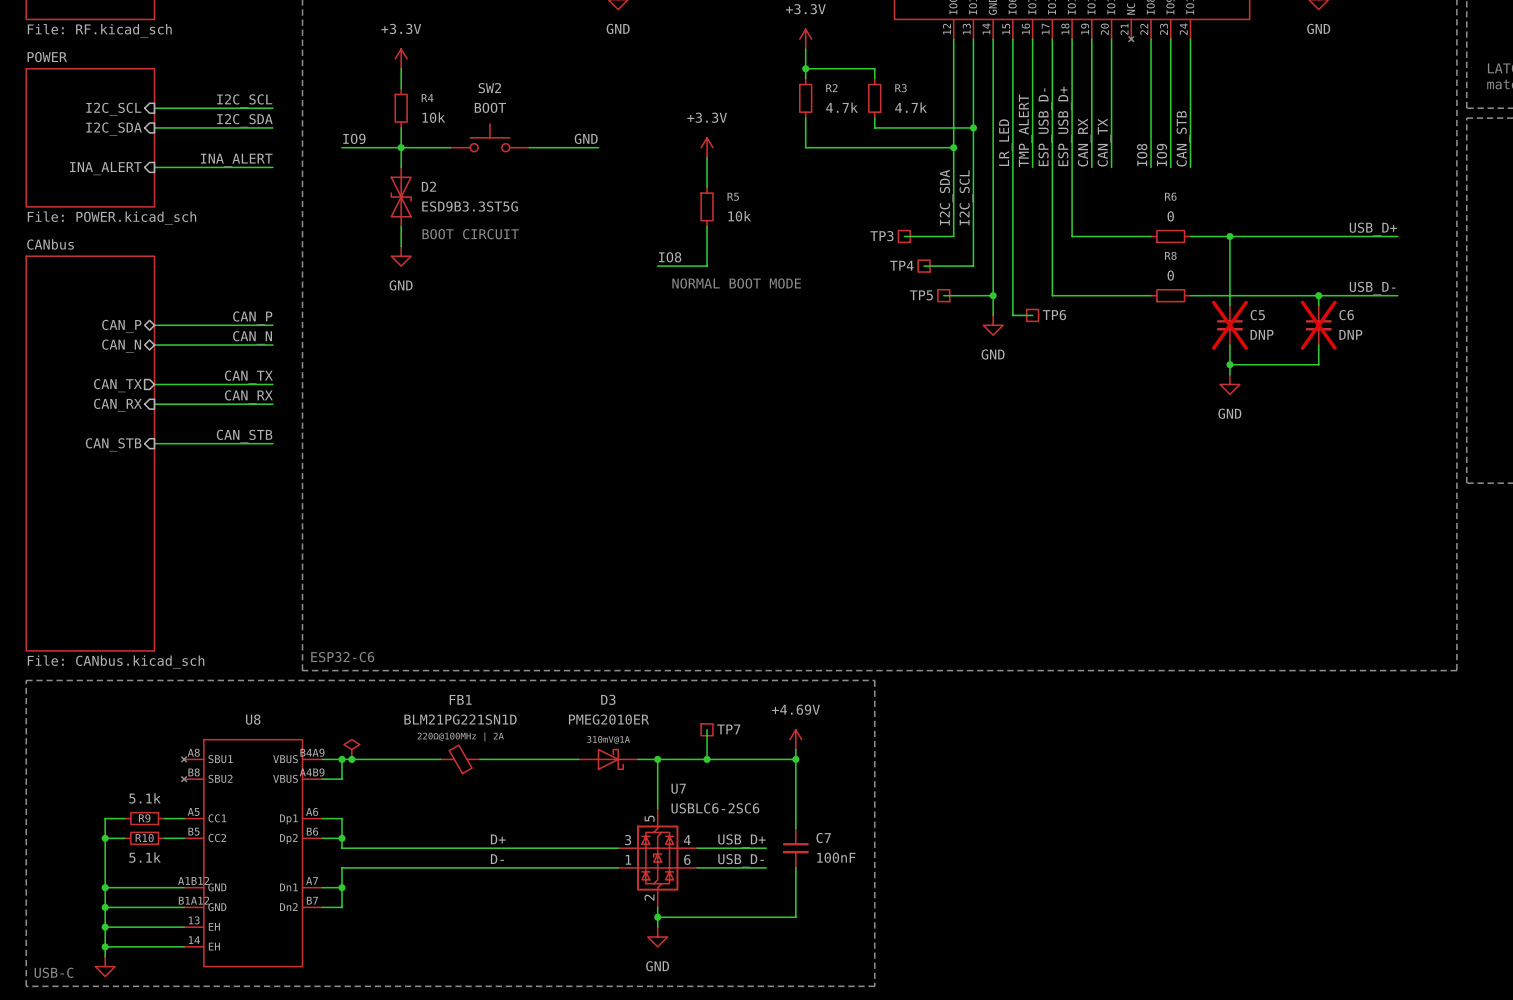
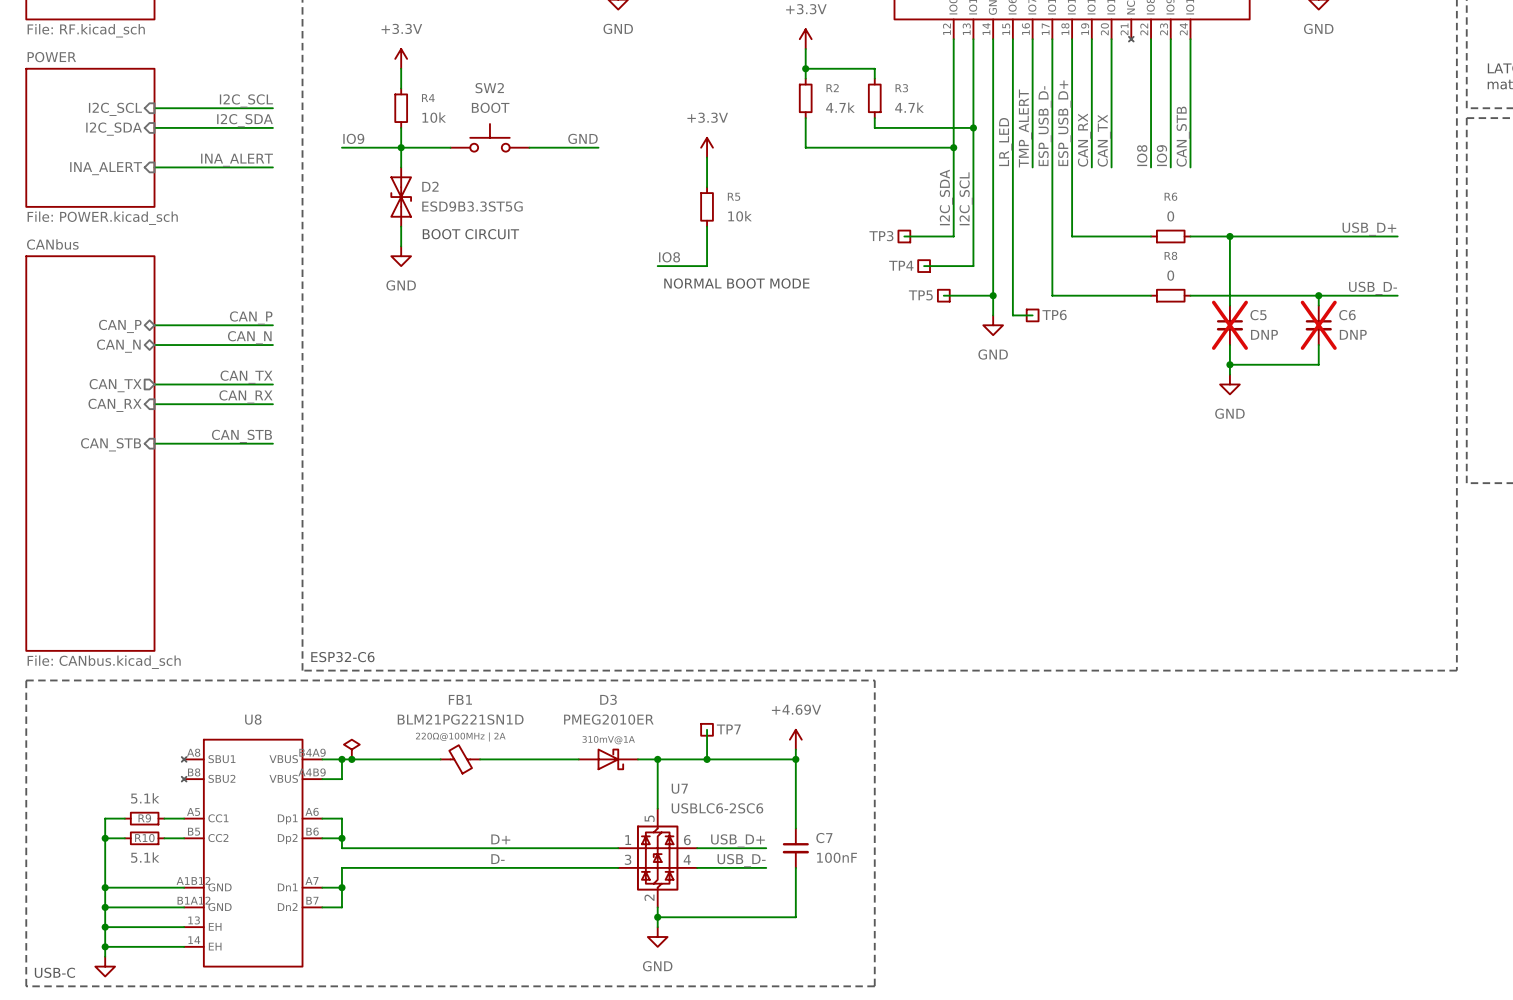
U7 pin number: 3 (628, 840) -> 1 (628, 840)
U7 pin number: 4 (687, 840) -> 6 (687, 840)
U7 pin number: 1 (628, 859) -> 3 (628, 859)
U7 pin number: 6 (687, 859) -> 4 (687, 859)

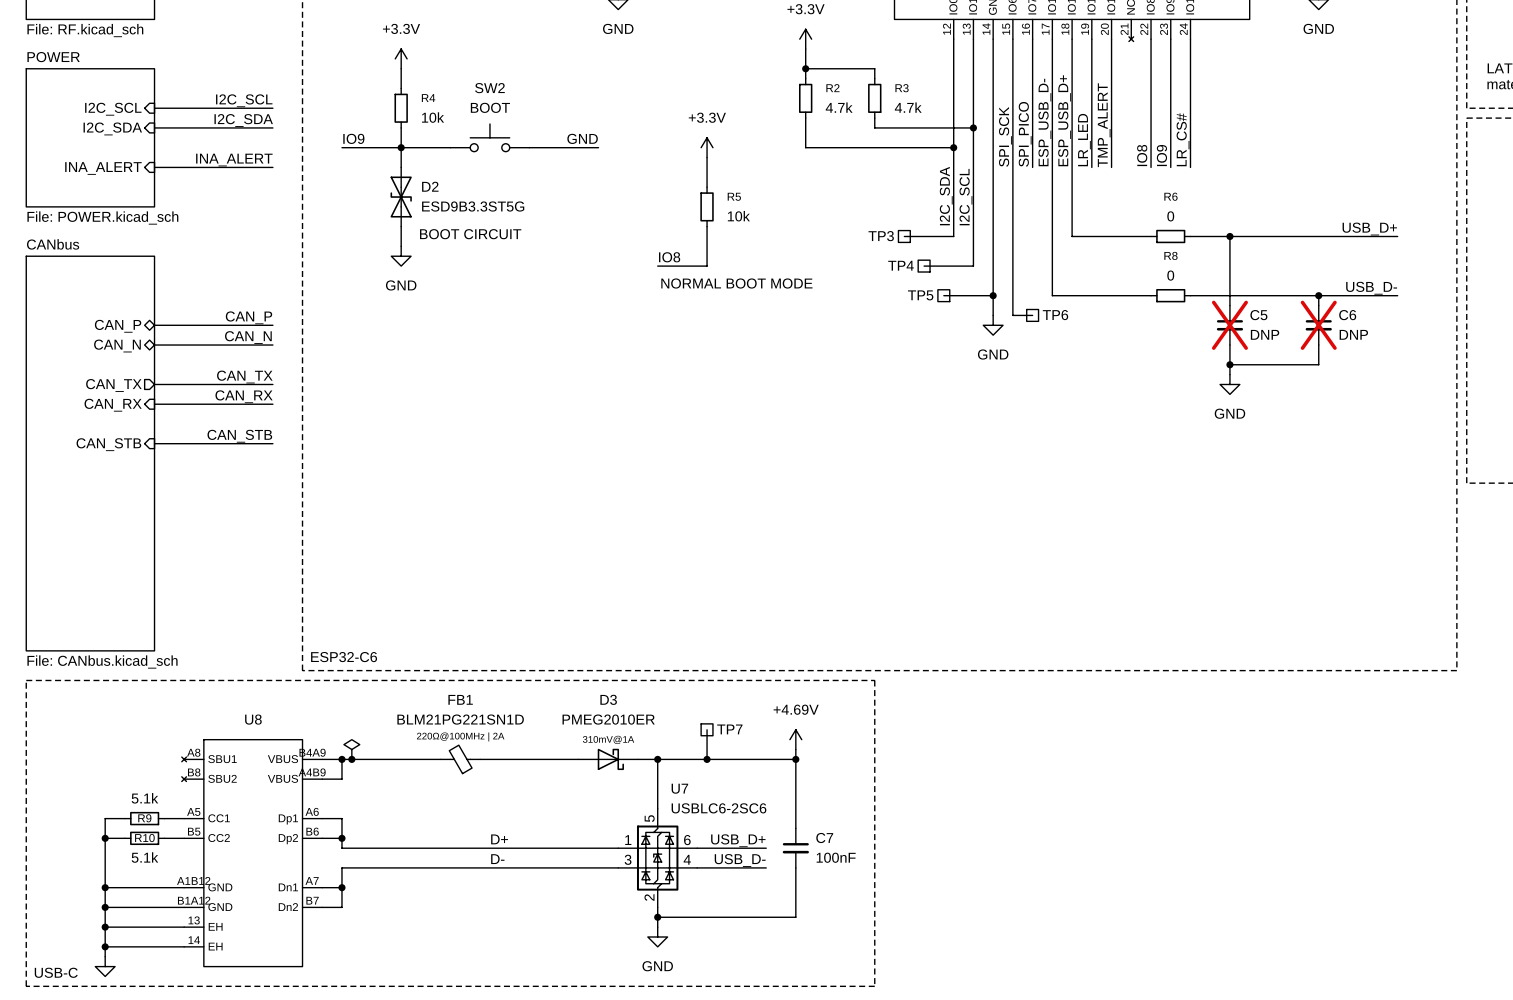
label: TMP_ALERT (1025, 128) -> SPI_PICO (1025, 134)
label: CAN_STB (1183, 136) -> LR_CS# (1183, 139)
label: CAN_RX (1084, 140) -> LR_LED (1084, 140)
label: CAN_TX (1104, 140) -> TMP_ALERT (1104, 125)
label: LR_LED (1005, 142) -> SPI_SCK (1005, 136)

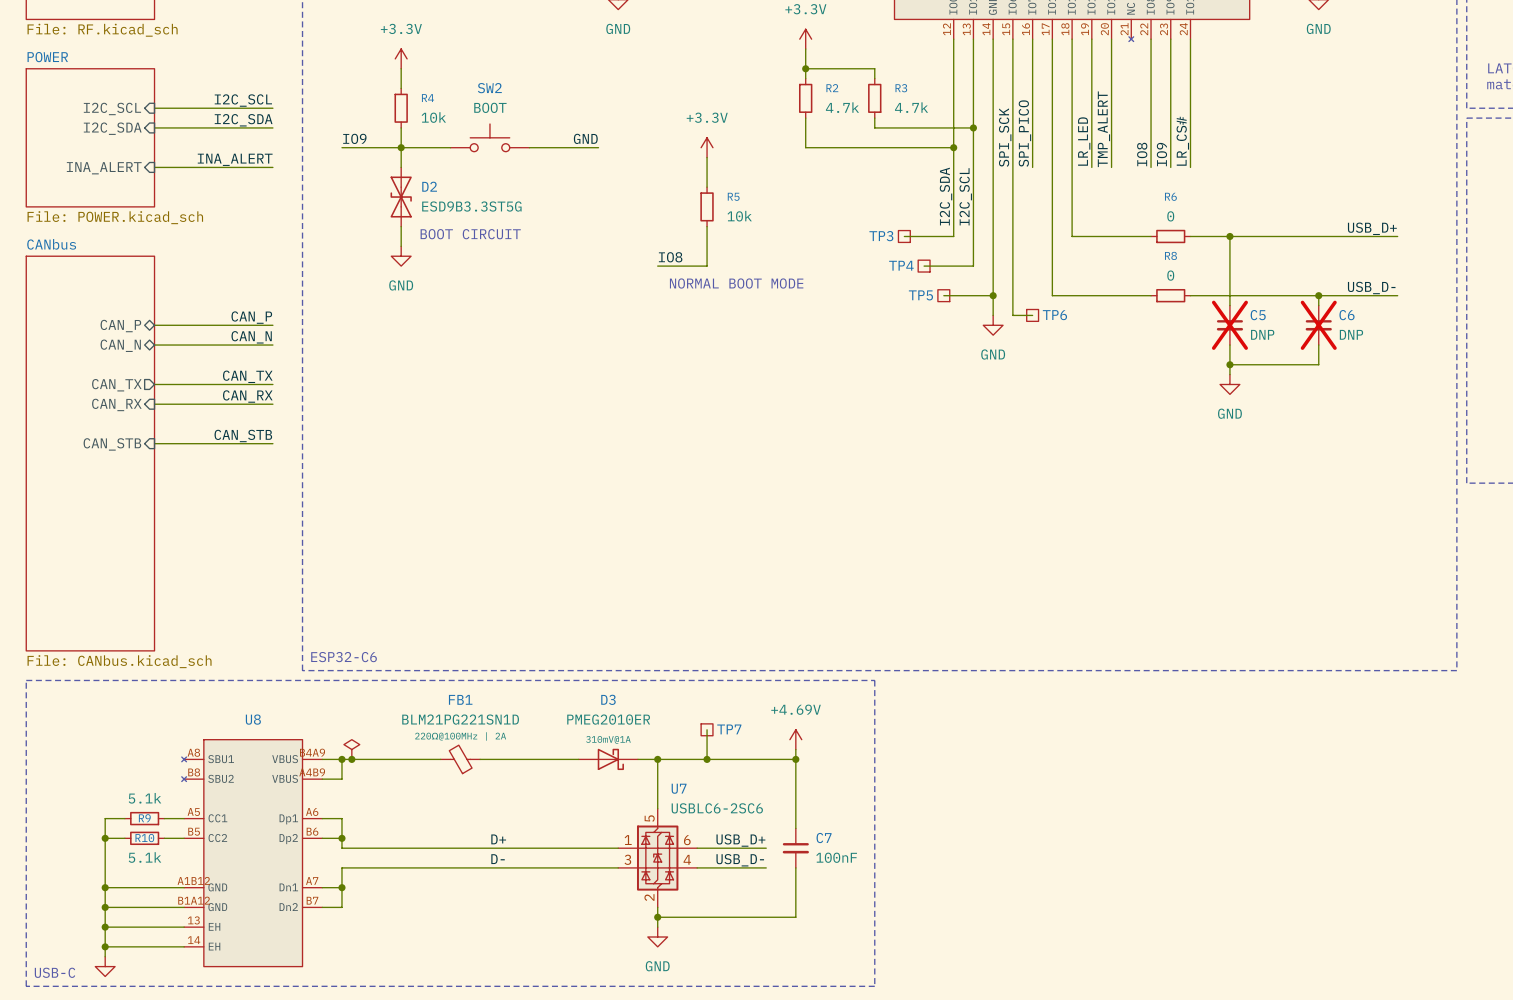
label: ESP_USB_D+ (1064, 120) -> none
label: ESP_USB_D- (1044, 122) -> none

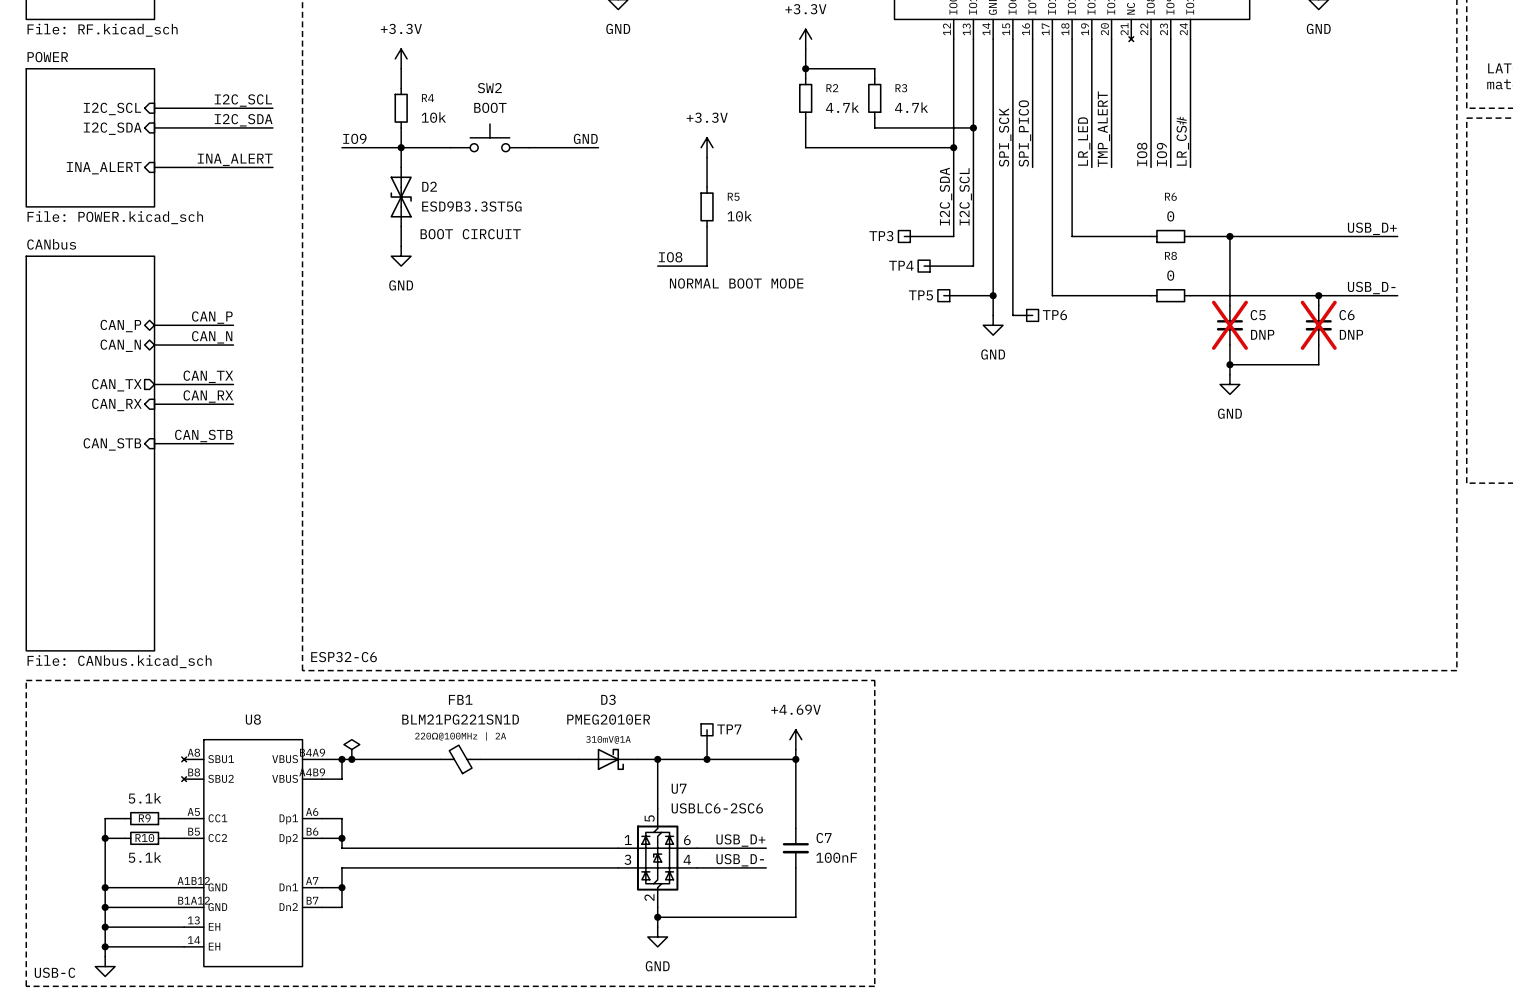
label position: CAN_P (251, 317) -> CAN_P (212, 317)
wire: (233, 325) (272, 325) -> none
label position: CAN_N (251, 337) -> CAN_N (212, 337)
wire: (233, 345) (272, 345) -> none
label position: CAN_TX (247, 376) -> CAN_TX (208, 376)
wire: (233, 384) (272, 384) -> none
label position: CAN_RX (247, 396) -> CAN_RX (208, 396)
wire: (233, 404) (272, 404) -> none
label position: CAN_STB (243, 435) -> CAN_STB (203, 435)
wire: (233, 443) (272, 443) -> none
label: D+ (498, 839) -> none
label: D- (498, 859) -> none

